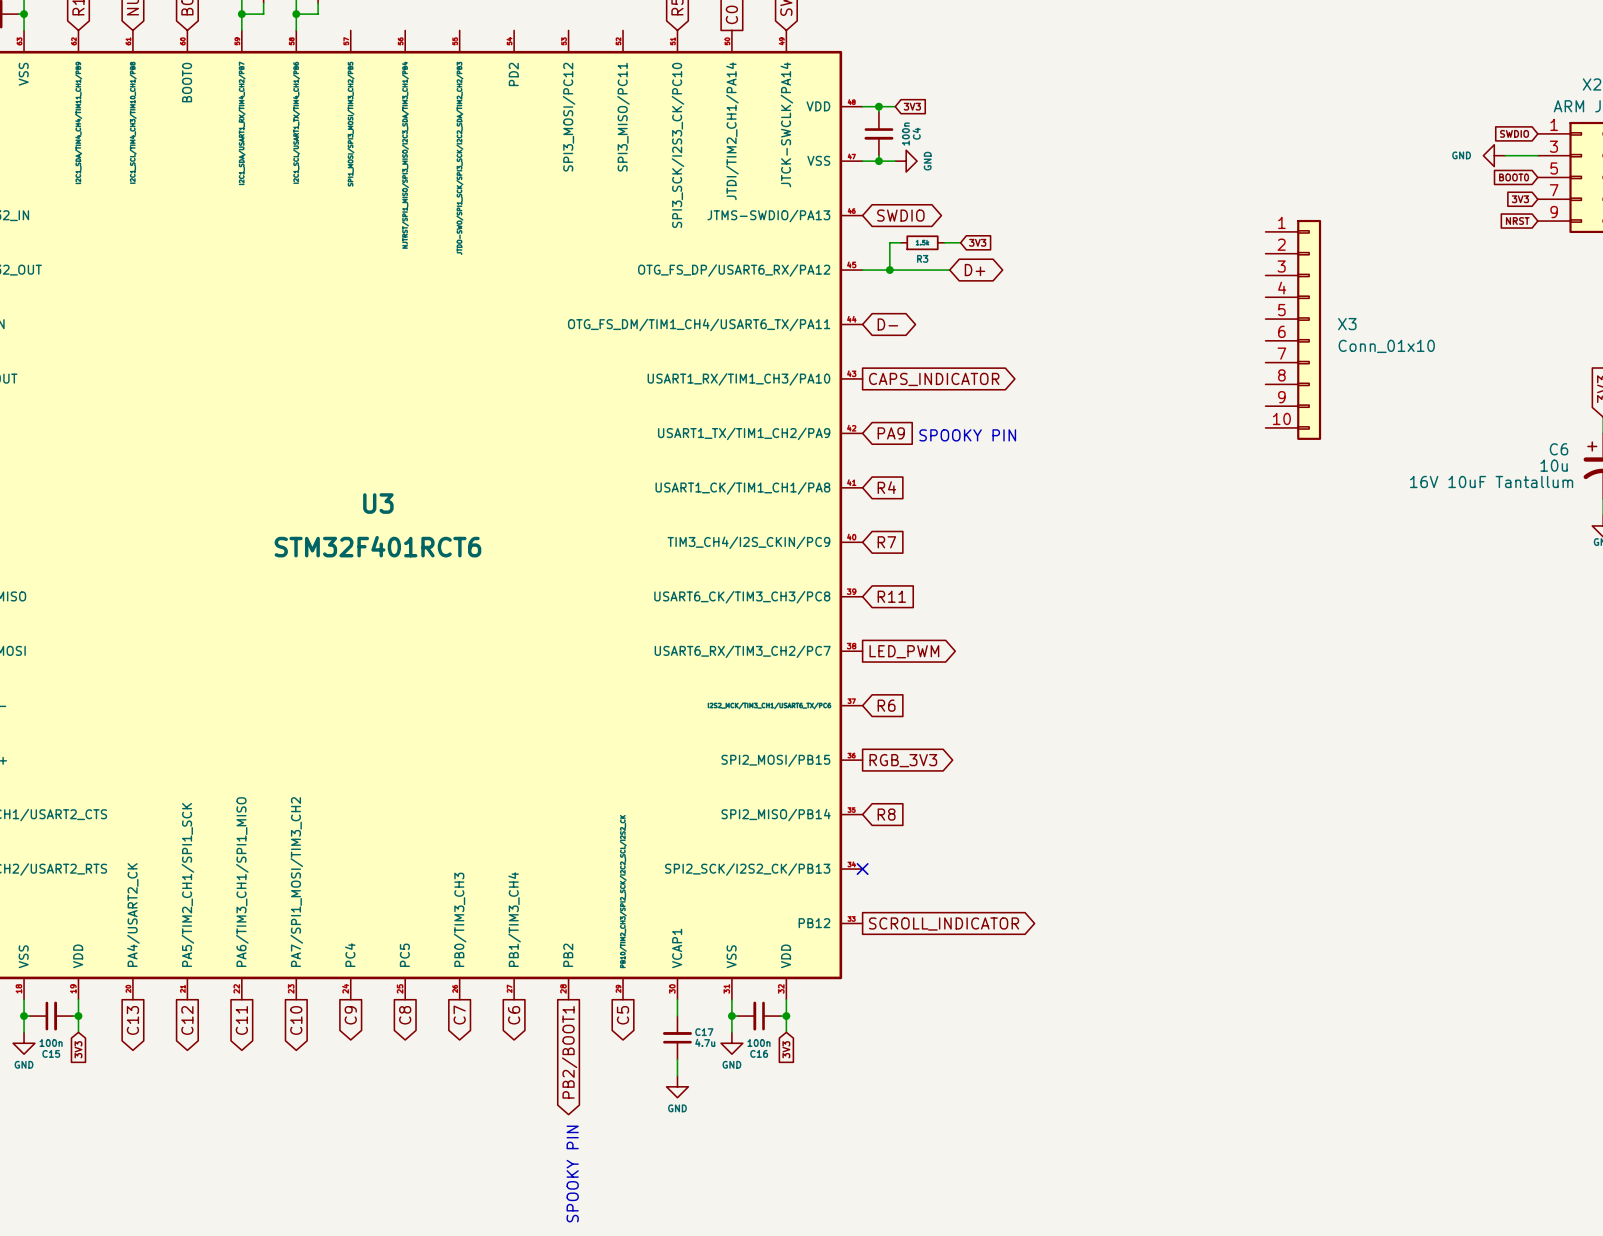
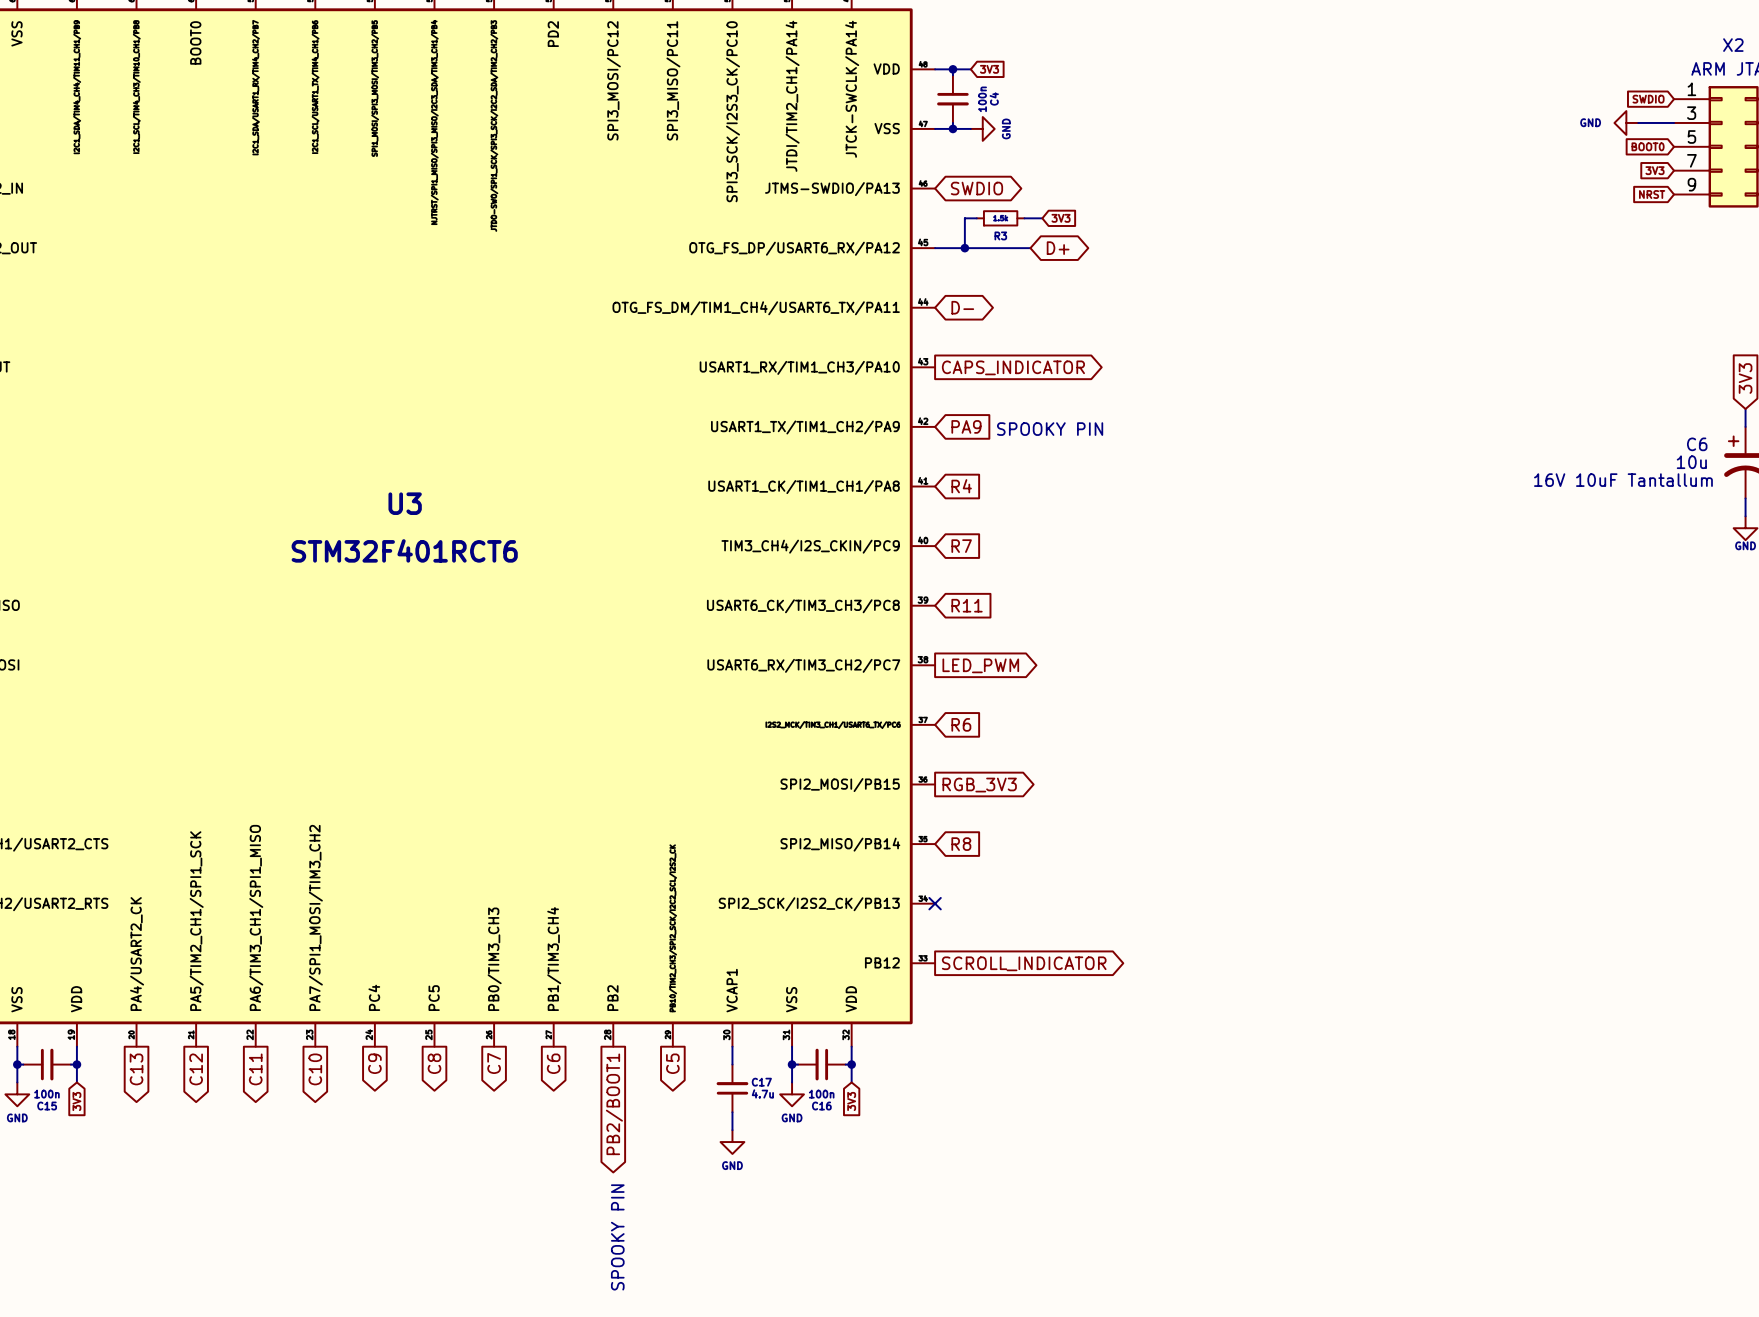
X3: Conn_01x10 (1293, 329) -> none

